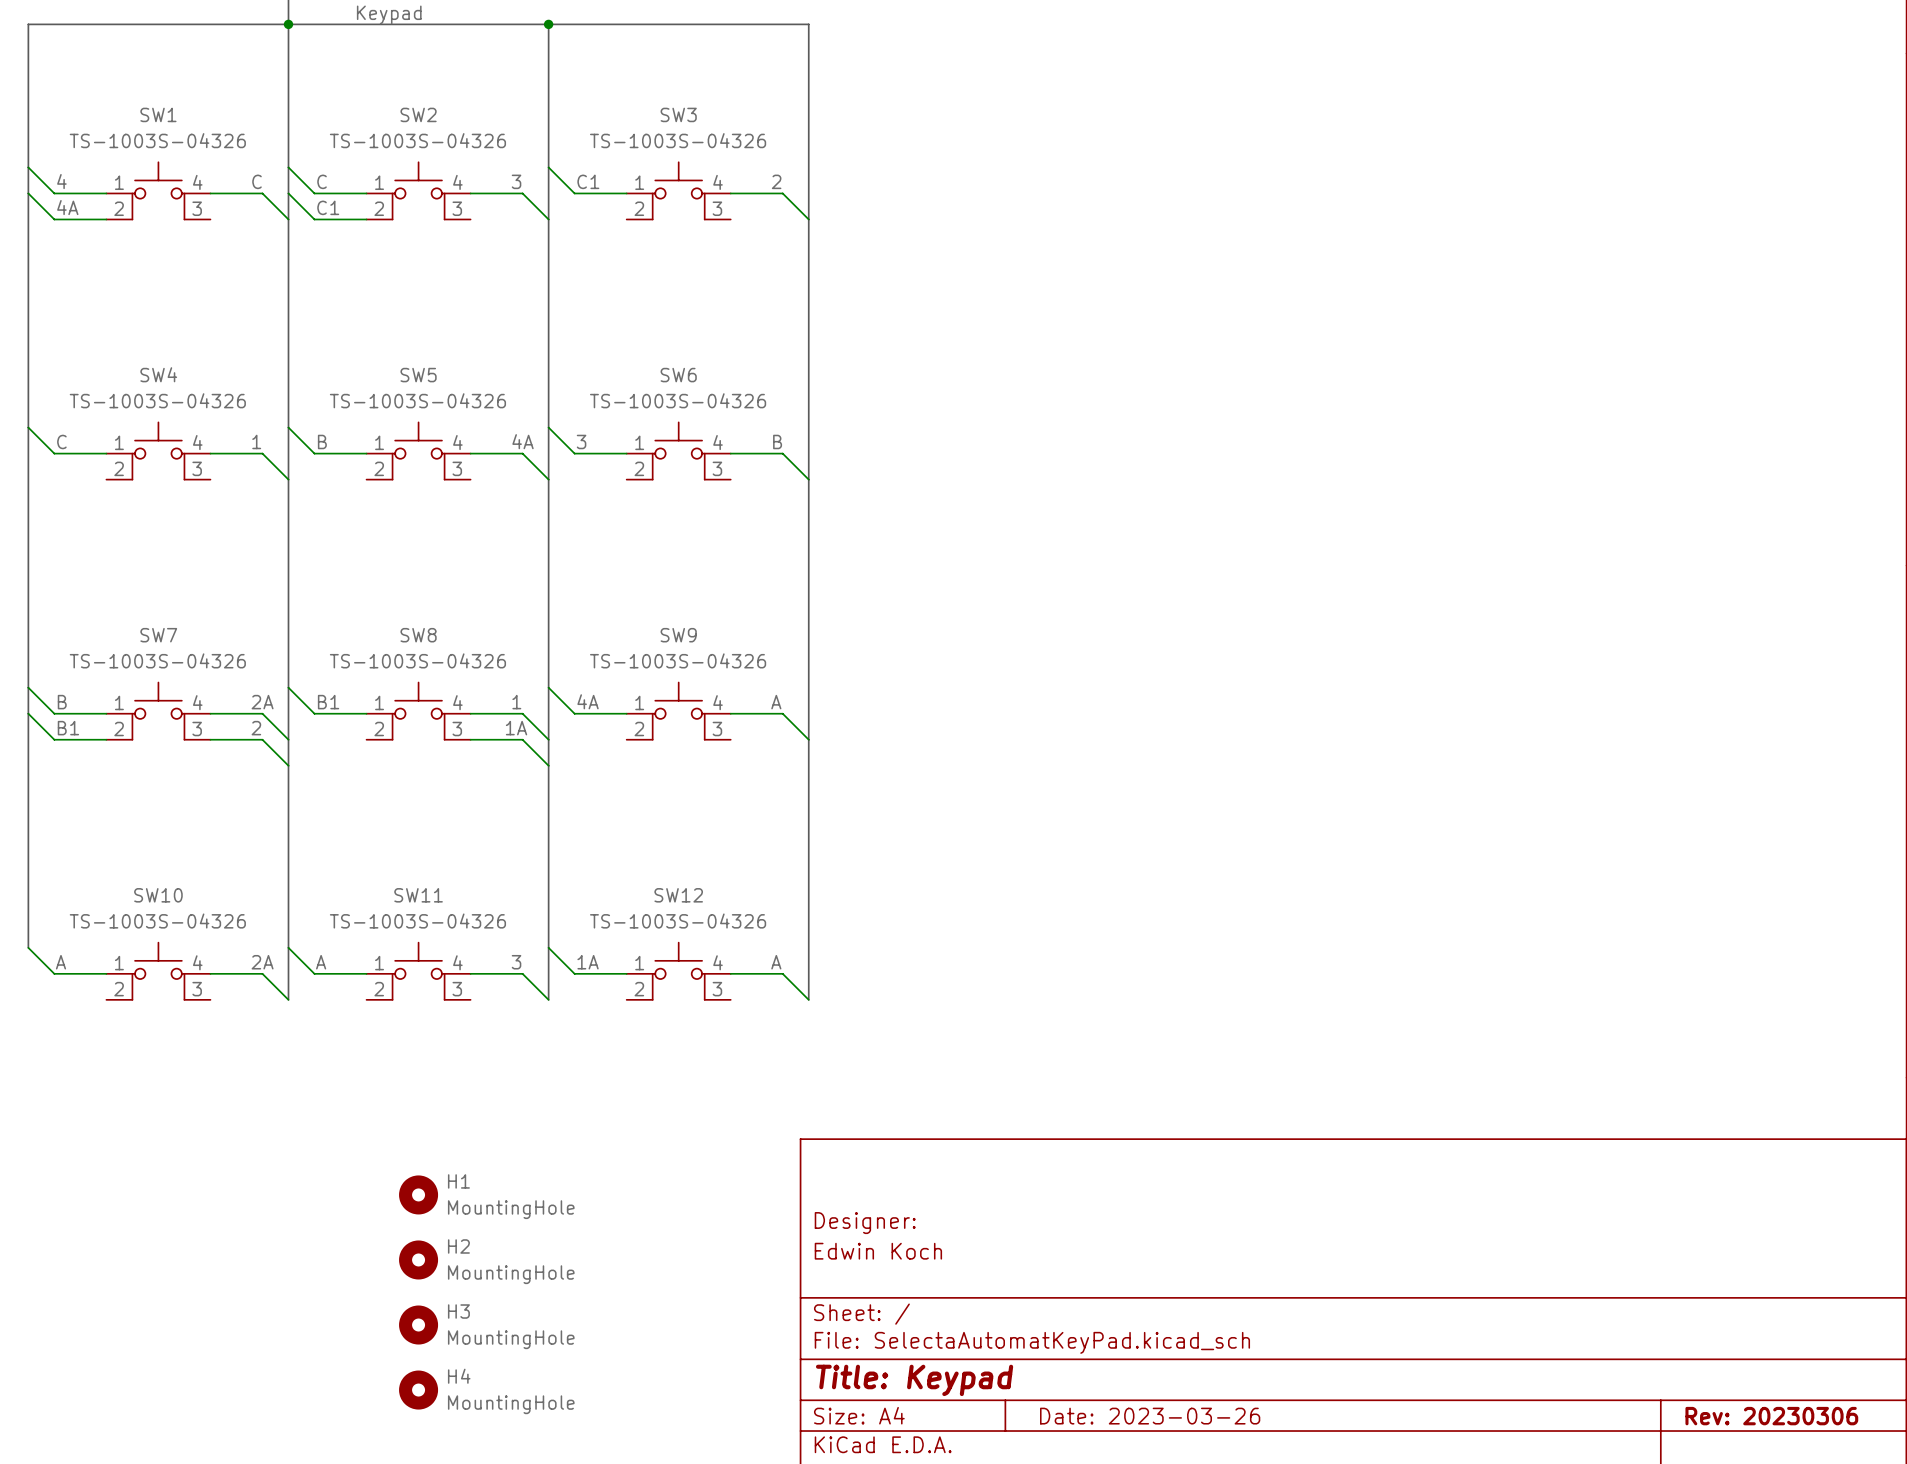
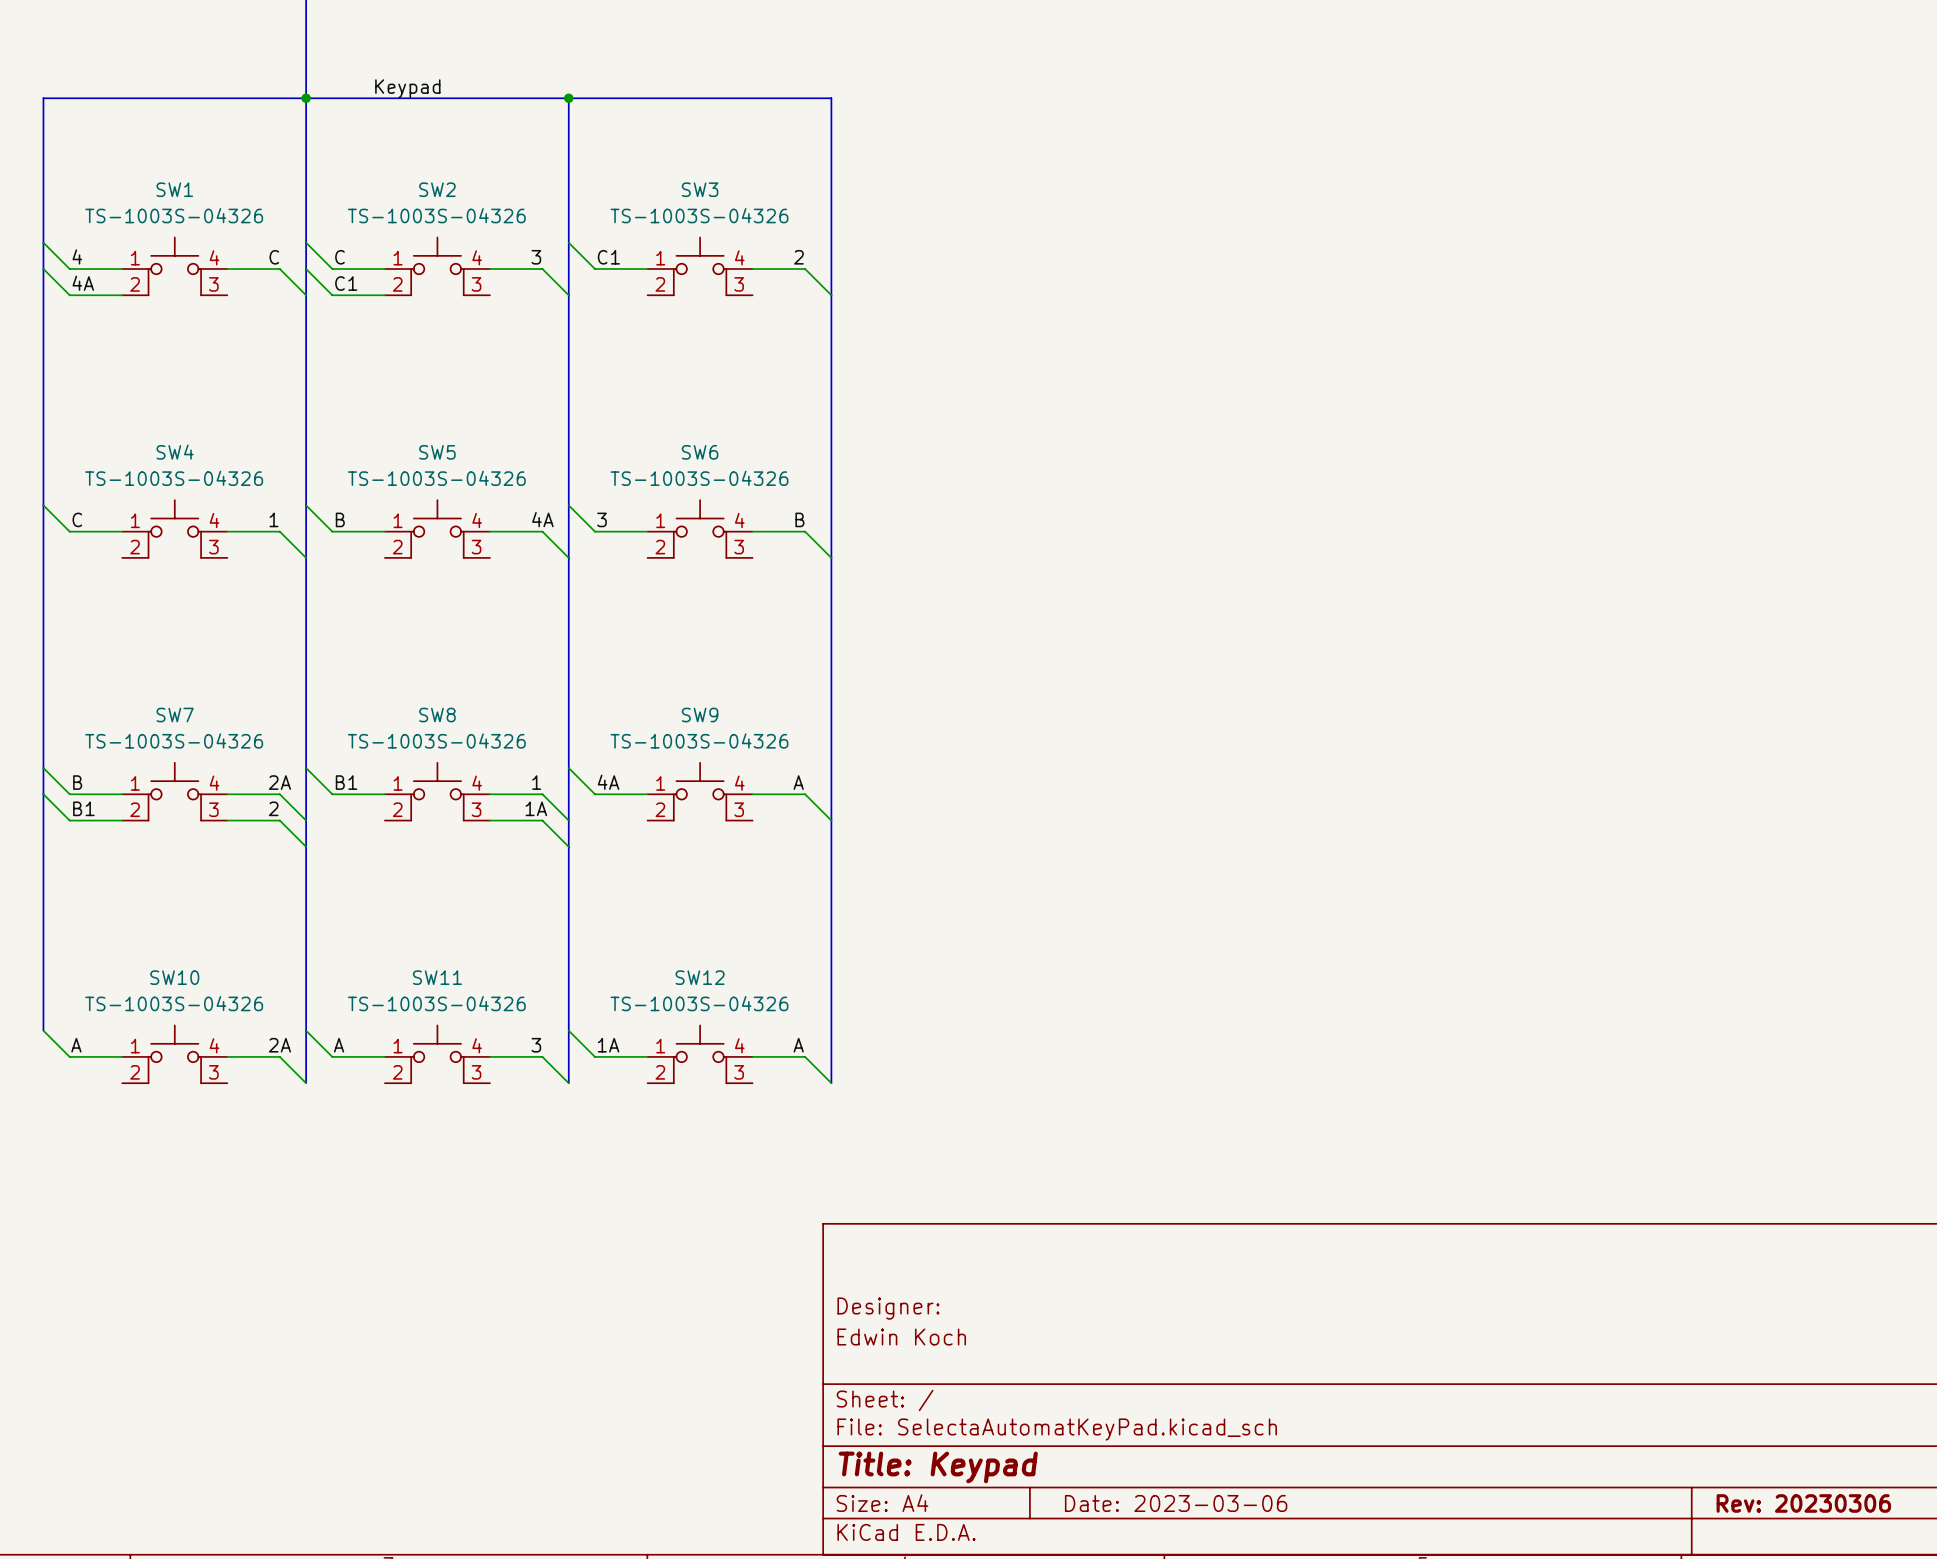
H1: MountingHole (418, 1194) -> none
H2: MountingHole (418, 1259) -> none
H3: MountingHole (418, 1325) -> none
H4: MountingHole (418, 1390) -> none
title block: Date: 2023-03-26 (1150, 1416) -> Date: 2023-03-06 (1176, 1503)

